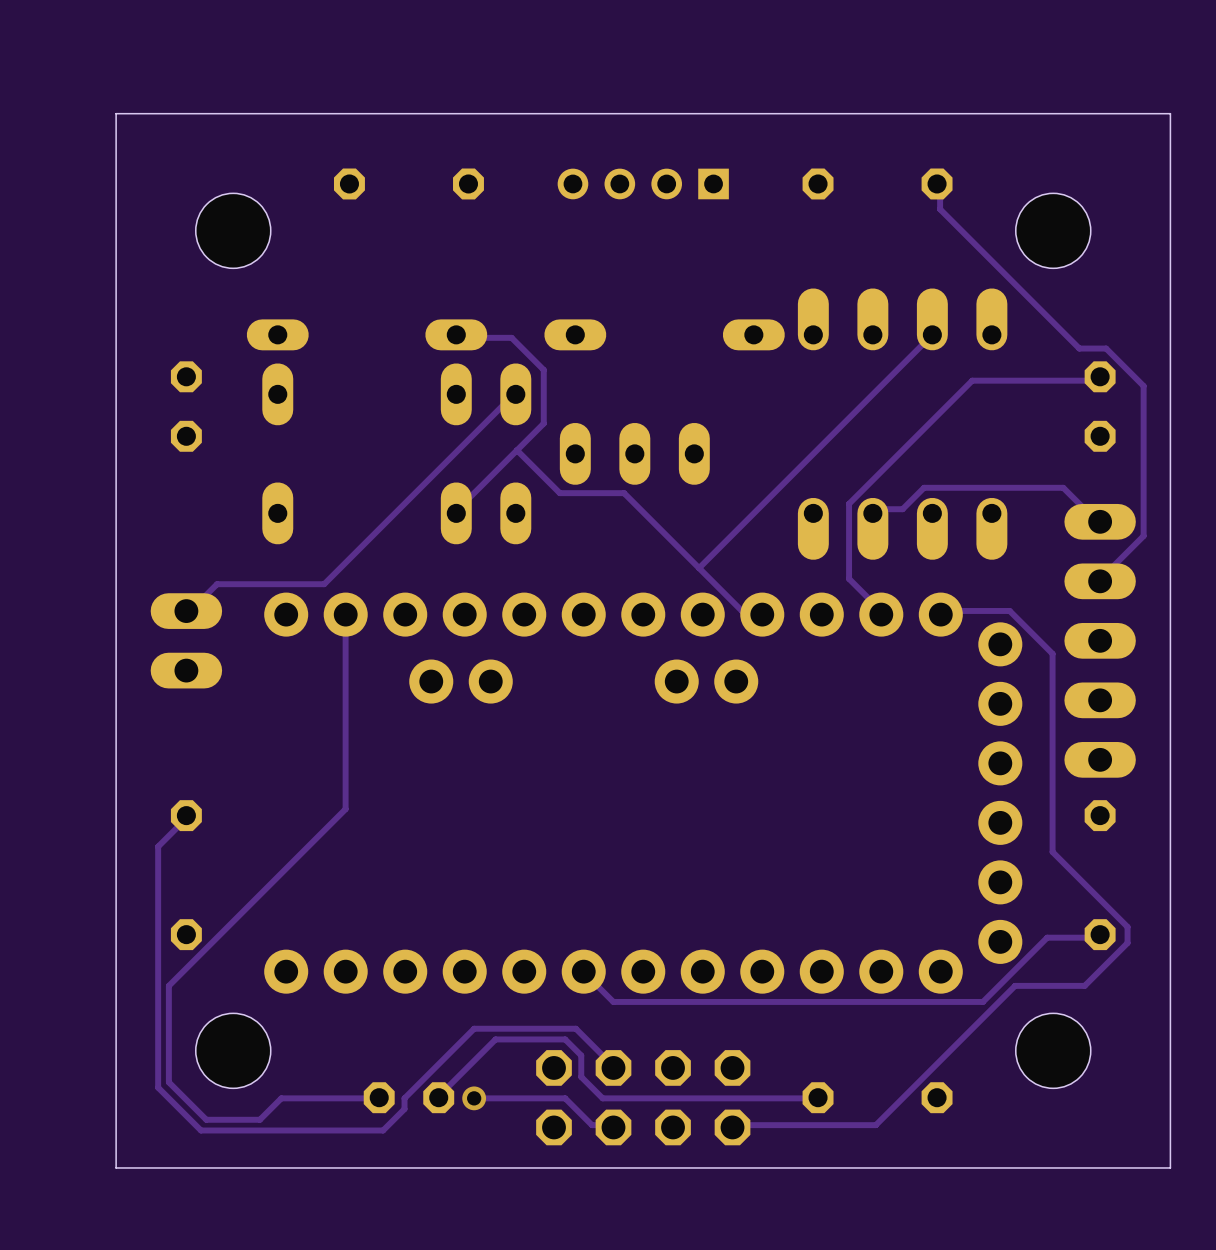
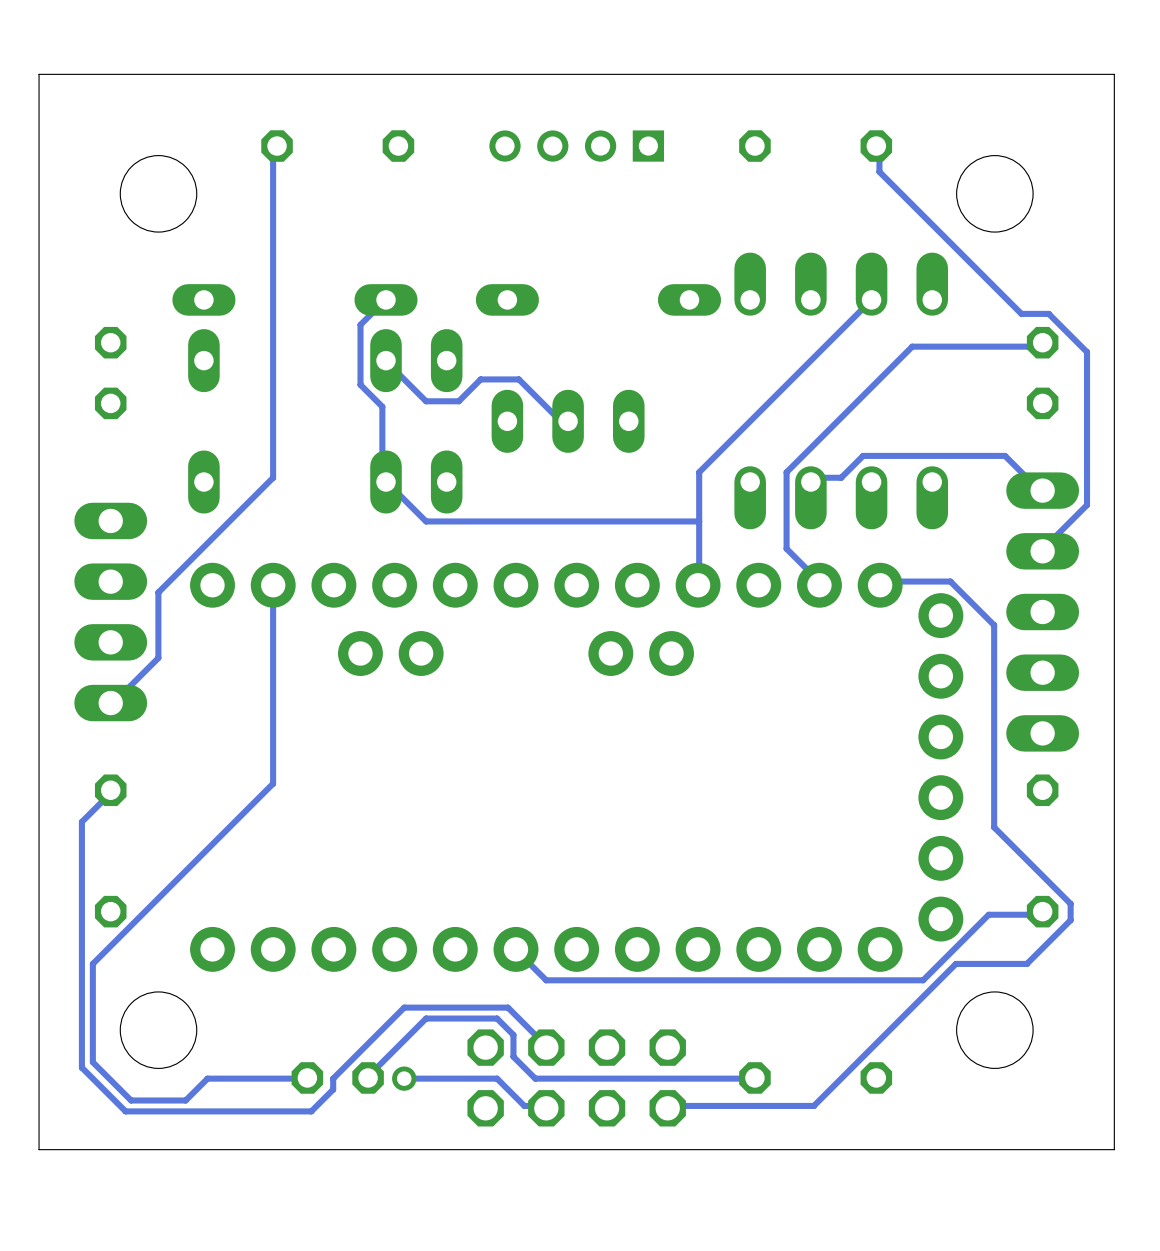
track: none -> (277, 146) (273, 150) (273, 477) (158, 592) (158, 658) (114, 701) (110, 703)
track: (456, 334) (458, 337) (511, 337) (543, 369) (543, 423) (458, 509) (456, 513) -> (386, 299) (360, 324) (360, 384) (382, 406) (382, 477) (426, 521) (699, 521)
track: none -> (386, 360) (426, 401) (458, 401) (480, 379) (518, 379) (557, 417) (568, 417) (568, 421)
track: (515, 394) (324, 584) (217, 584) (190, 610) (186, 611) -> none
track: (517, 450) (559, 493) (624, 493) (741, 610) (758, 610) (762, 614) -> none
track: (763, 503) (699, 568) -> (699, 472) (698, 585)
part footprint: [150, 593, 223, 689] -> [74, 502, 148, 722]

